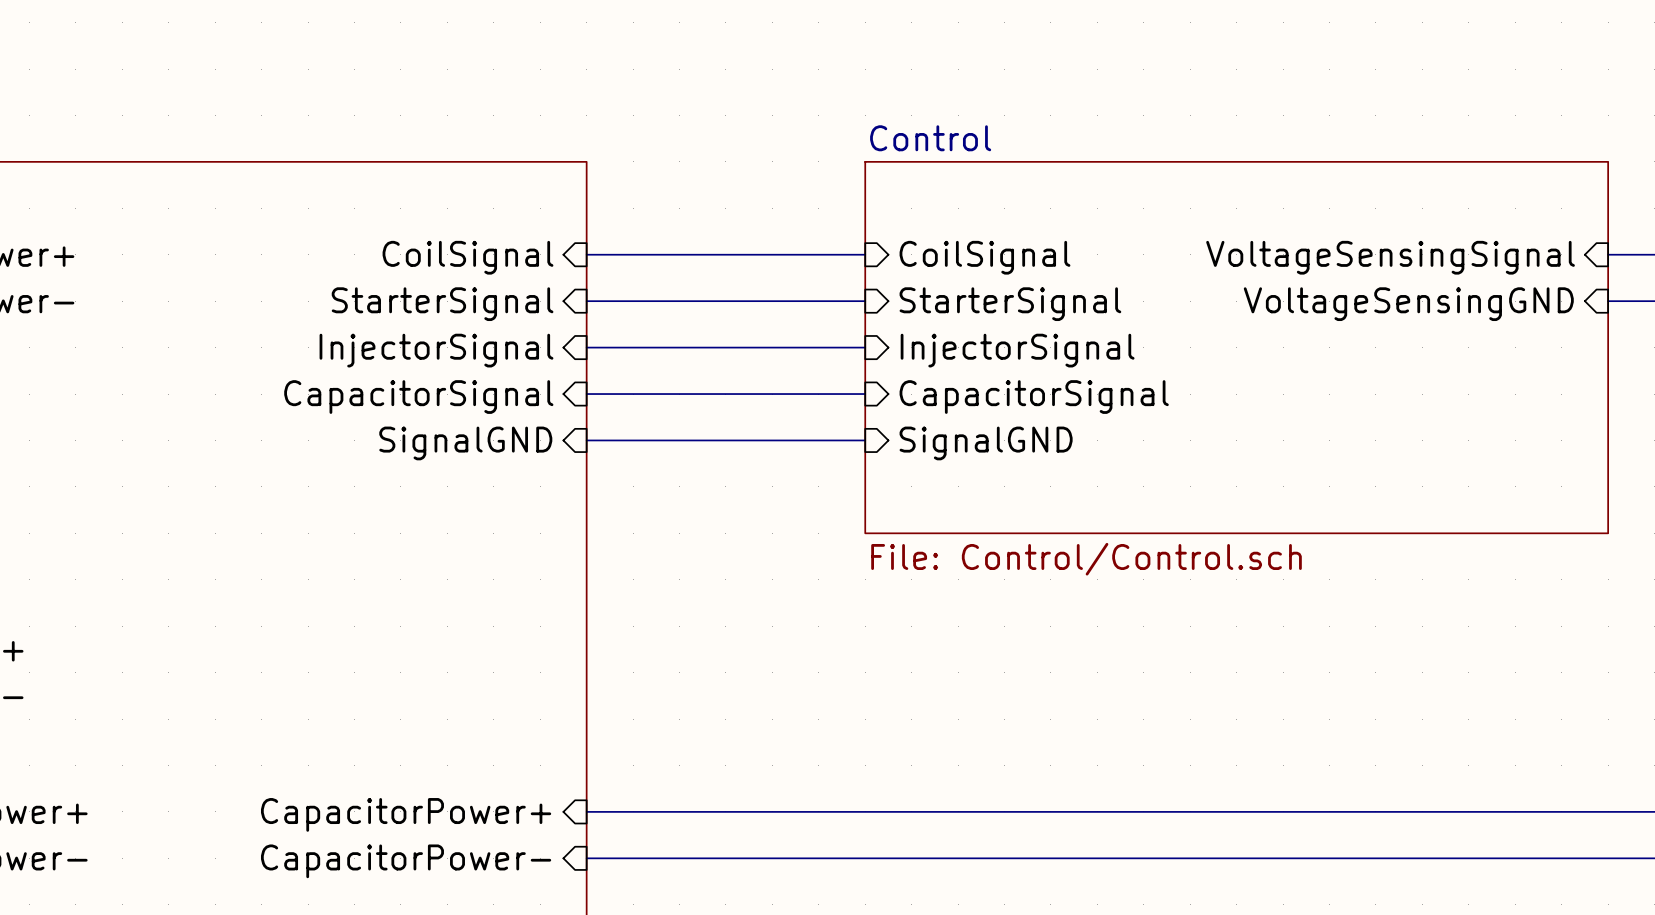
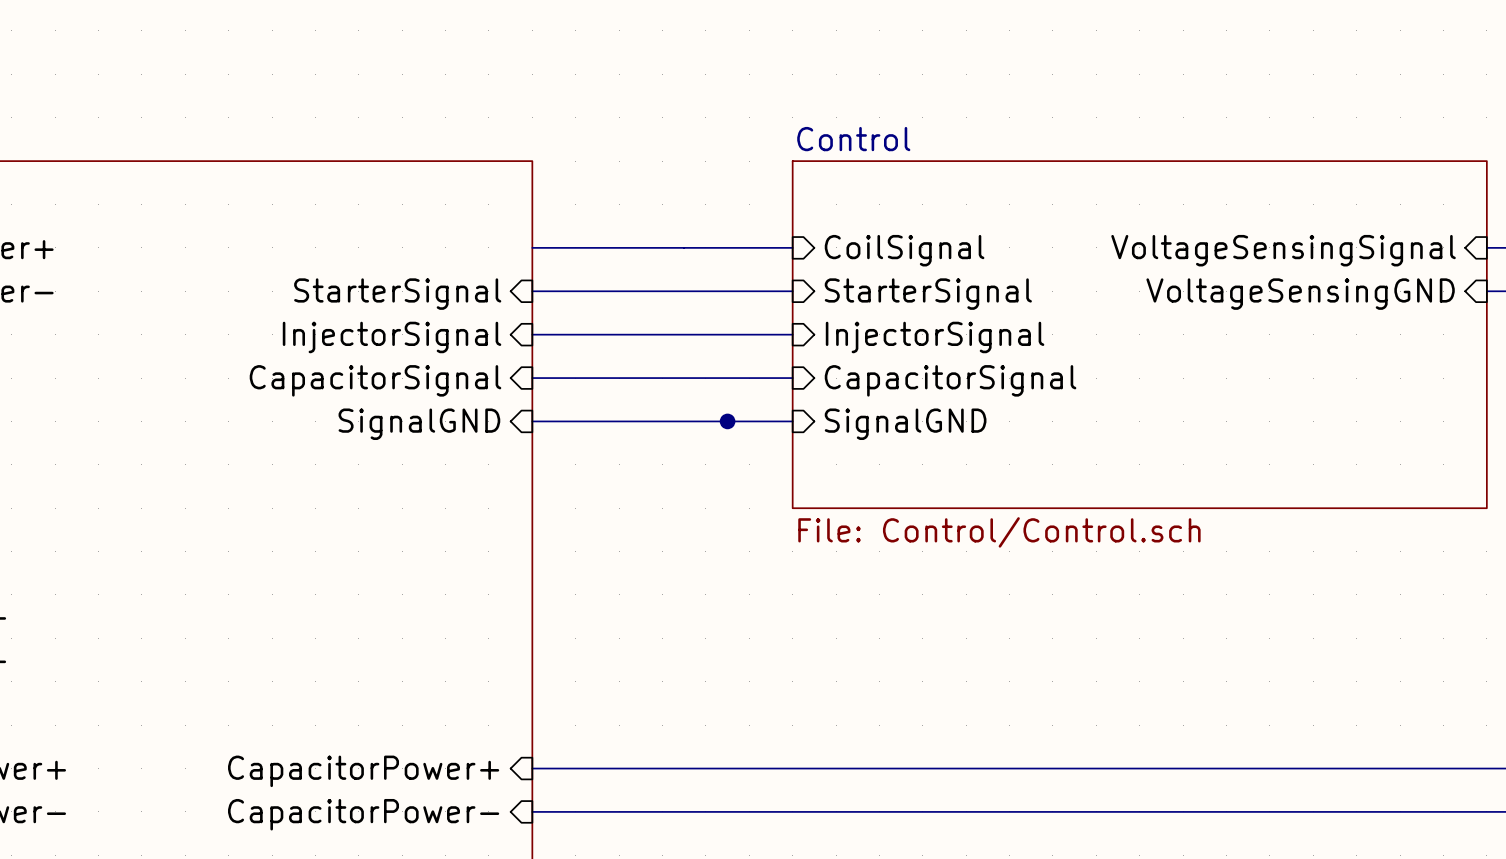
sheet pin: CoilSignal (468, 257) -> none
junction: none -> (727, 421)

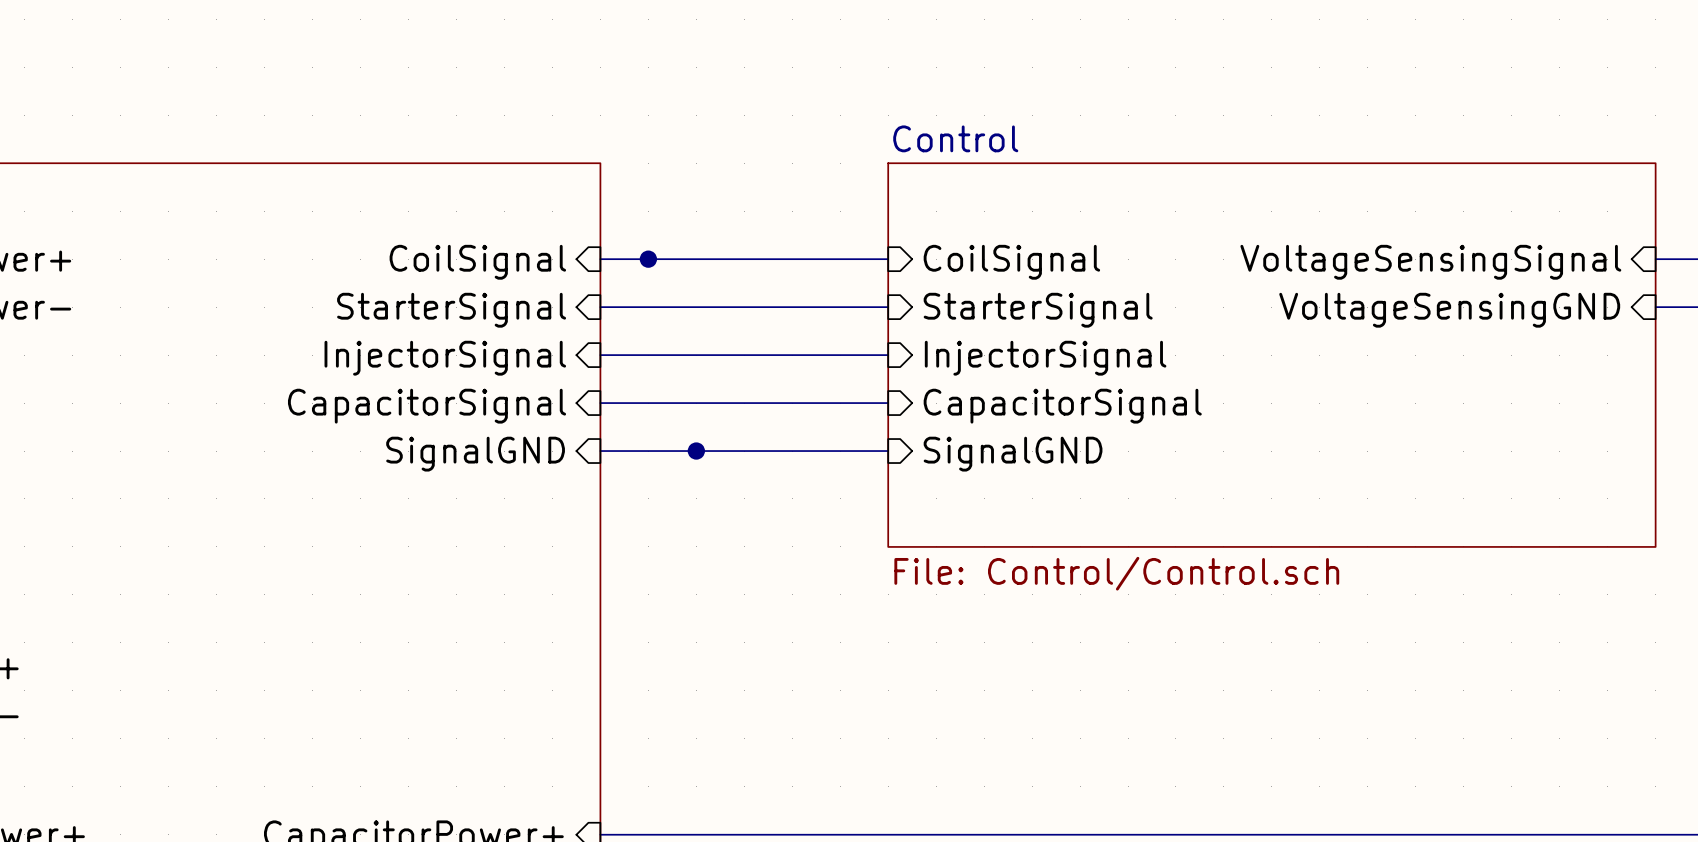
junction: none -> (648, 259)
sheet pin: none -> CoilSignal (477, 262)
junction: none -> (696, 451)
junction: (727, 421) -> none

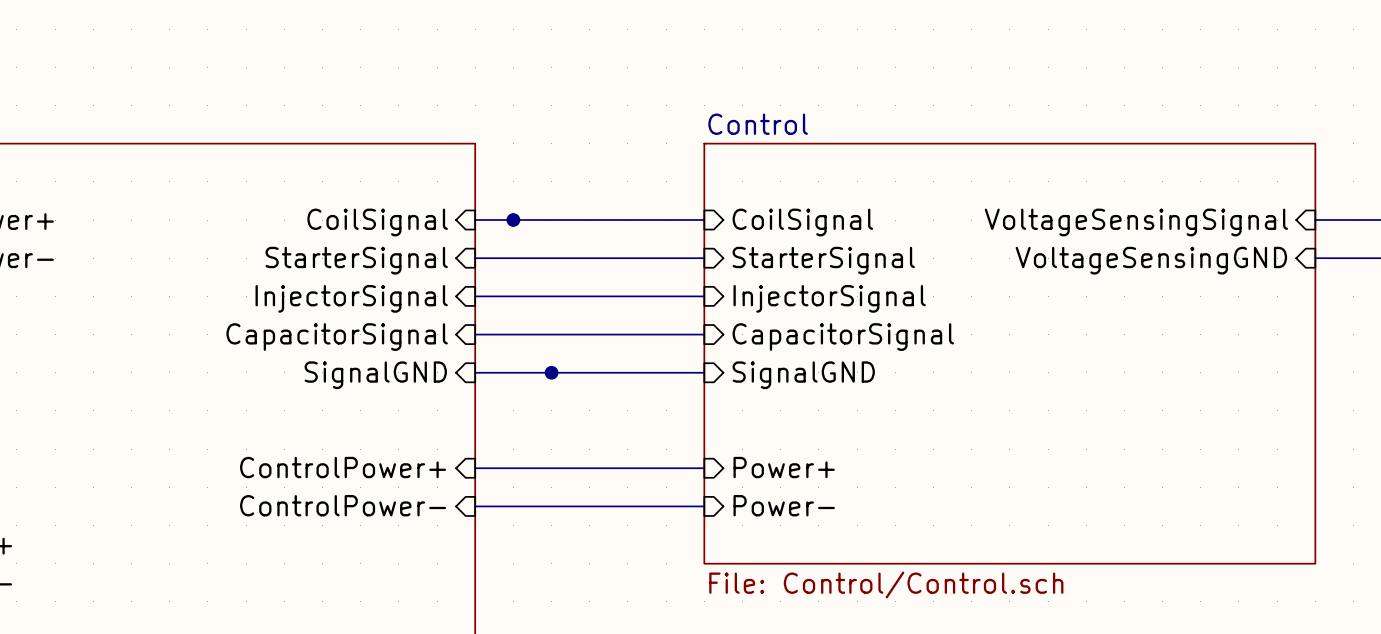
sheet Control: File: Control/Control.sch (1271, 355) -> none
sheet Control: none -> File: Control/Control.sch (1009, 353)
sheet pin: none -> ControlPower+ (343, 467)
wire: none -> (475, 468) (704, 468)
sheet pin: none -> Power+ (784, 467)
sheet pin: none -> ControlPower- (343, 505)
wire: none -> (475, 506) (704, 506)
sheet pin: none -> Power- (784, 505)

